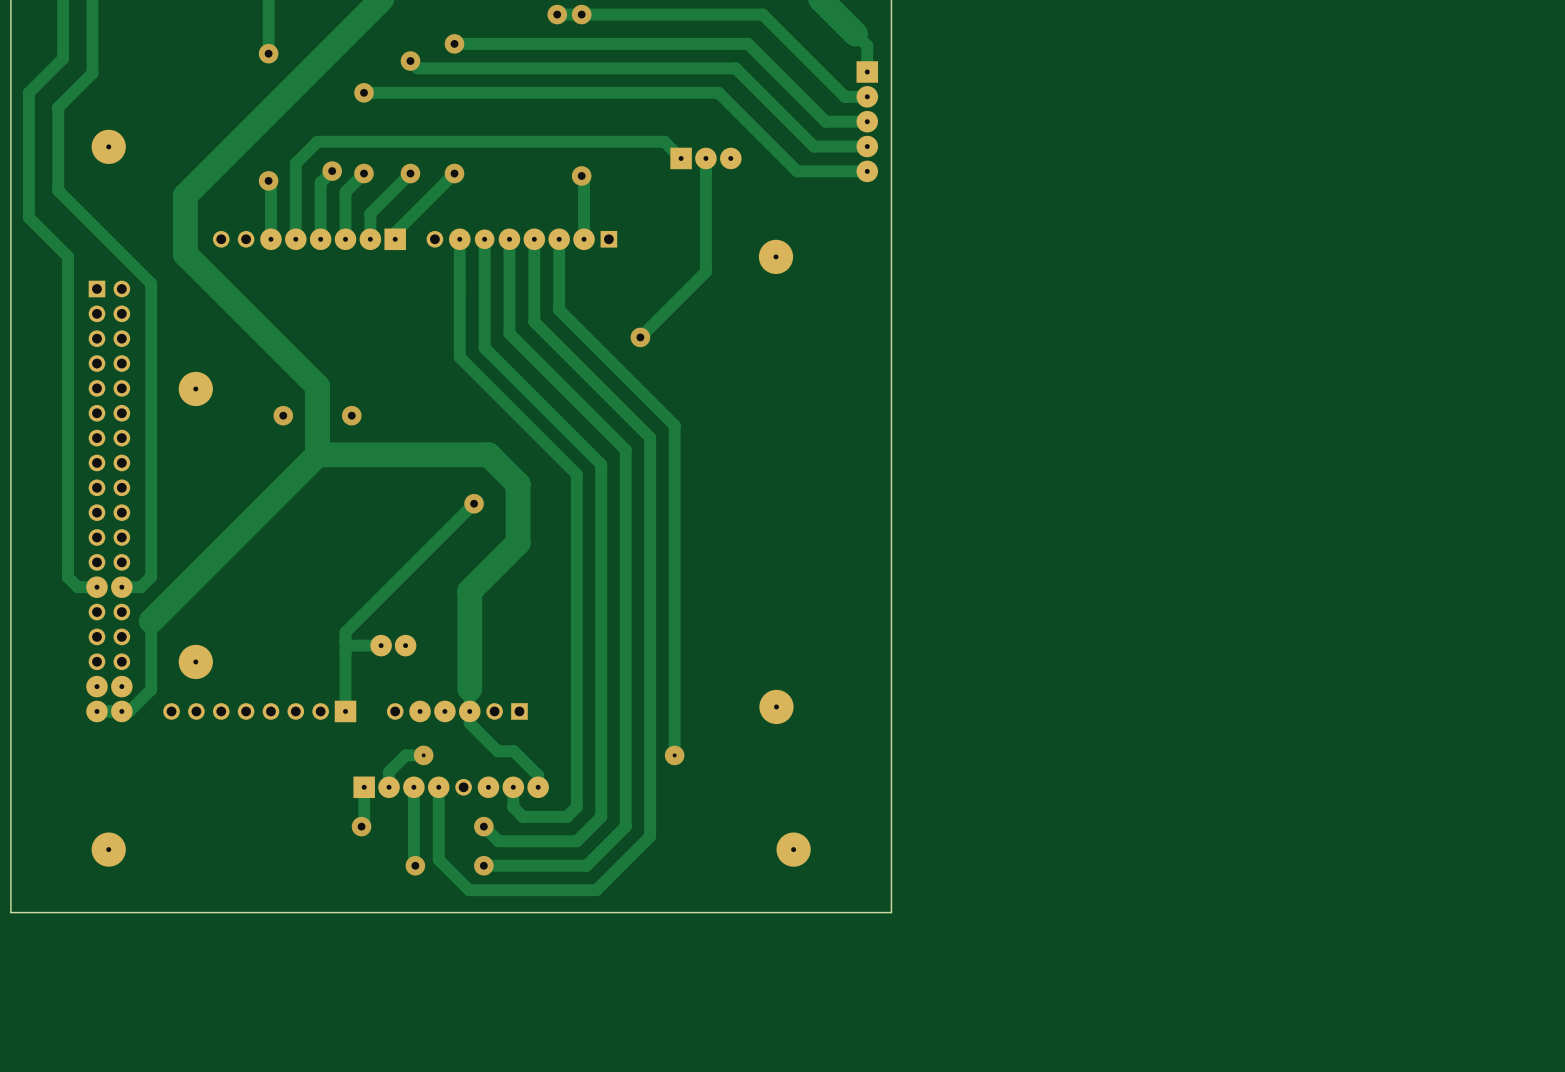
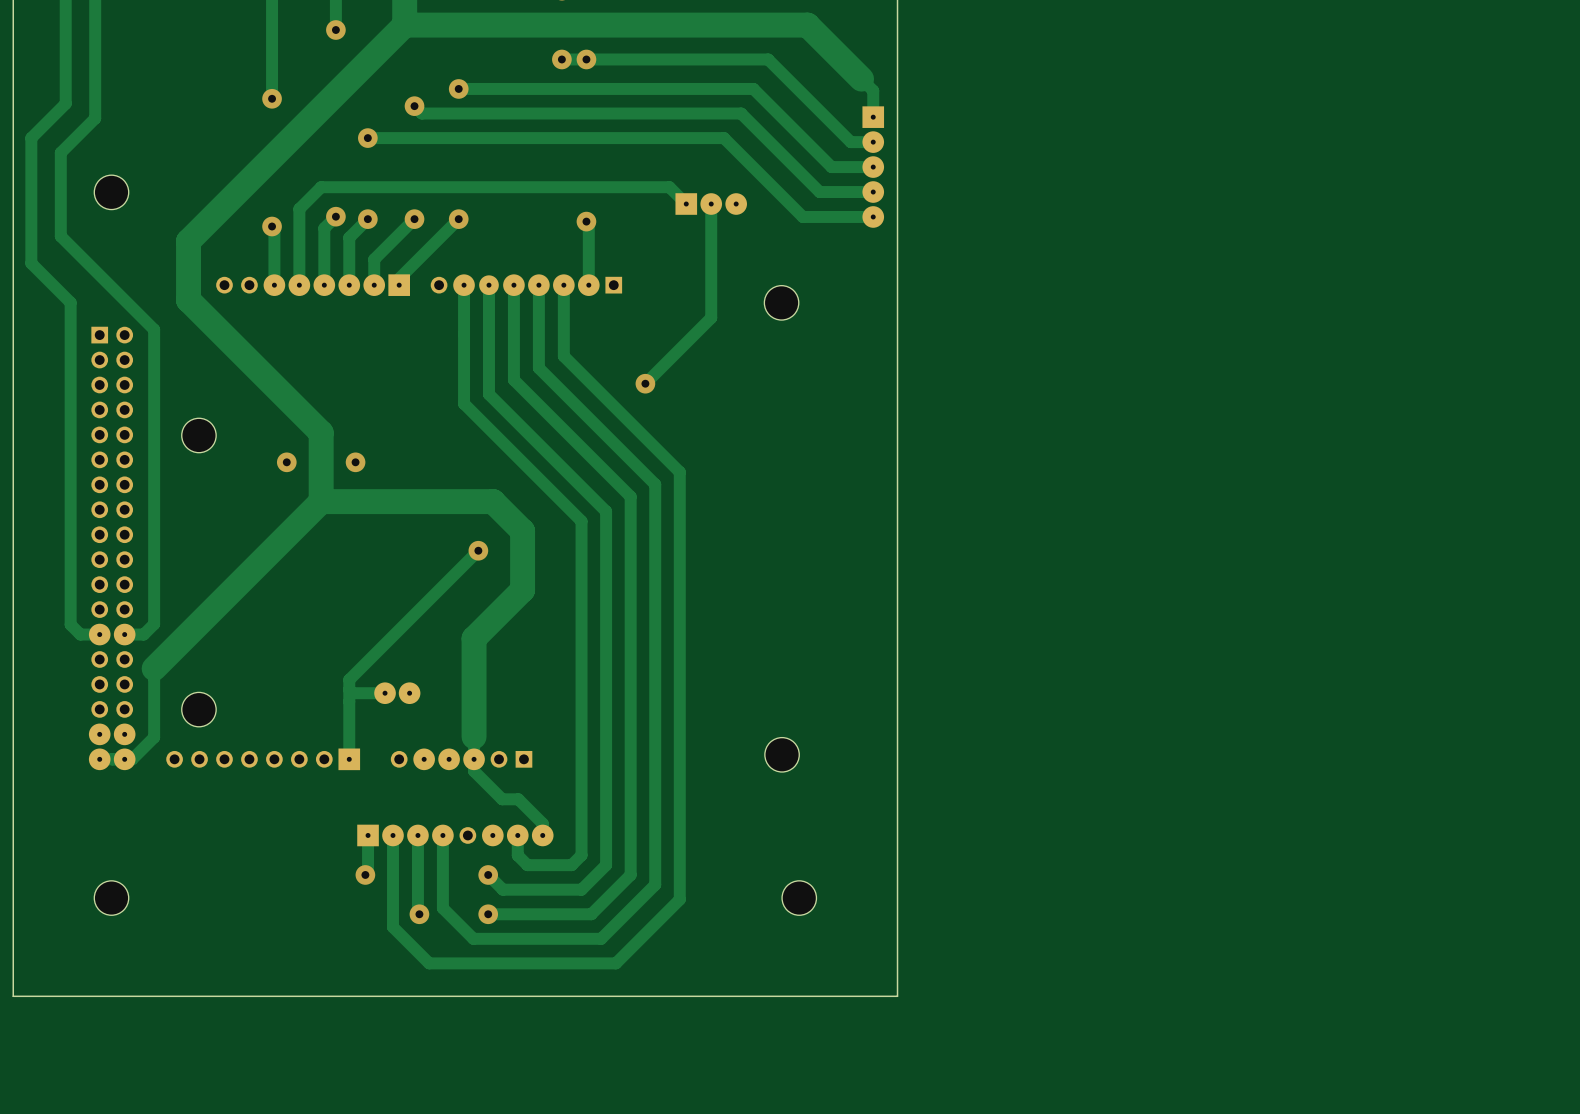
part footprint: [91, 129, 126, 164] -> [94, 175, 129, 210]
part footprint: [758, 239, 794, 275] -> [764, 285, 799, 321]
part footprint: [178, 371, 213, 407] -> [181, 418, 217, 453]
part footprint: [178, 644, 213, 680] -> [181, 692, 217, 727]
part footprint: [759, 689, 794, 725] -> [764, 737, 800, 773]
track: (423, 755) (405, 755) (389, 772) (389, 787) -> (679, 803) (679, 899) (615, 963) (429, 963) (392, 927) (392, 835)
via: (423, 755) -> none
via: (674, 755) -> none
part footprint: [91, 832, 126, 867] -> [94, 880, 129, 916]
part footprint: [776, 832, 811, 867] -> [782, 880, 817, 916]
board edge: (891, 912) (10, 912) -> (897, 961) (897, 996) (13, 996) (13, 961)

